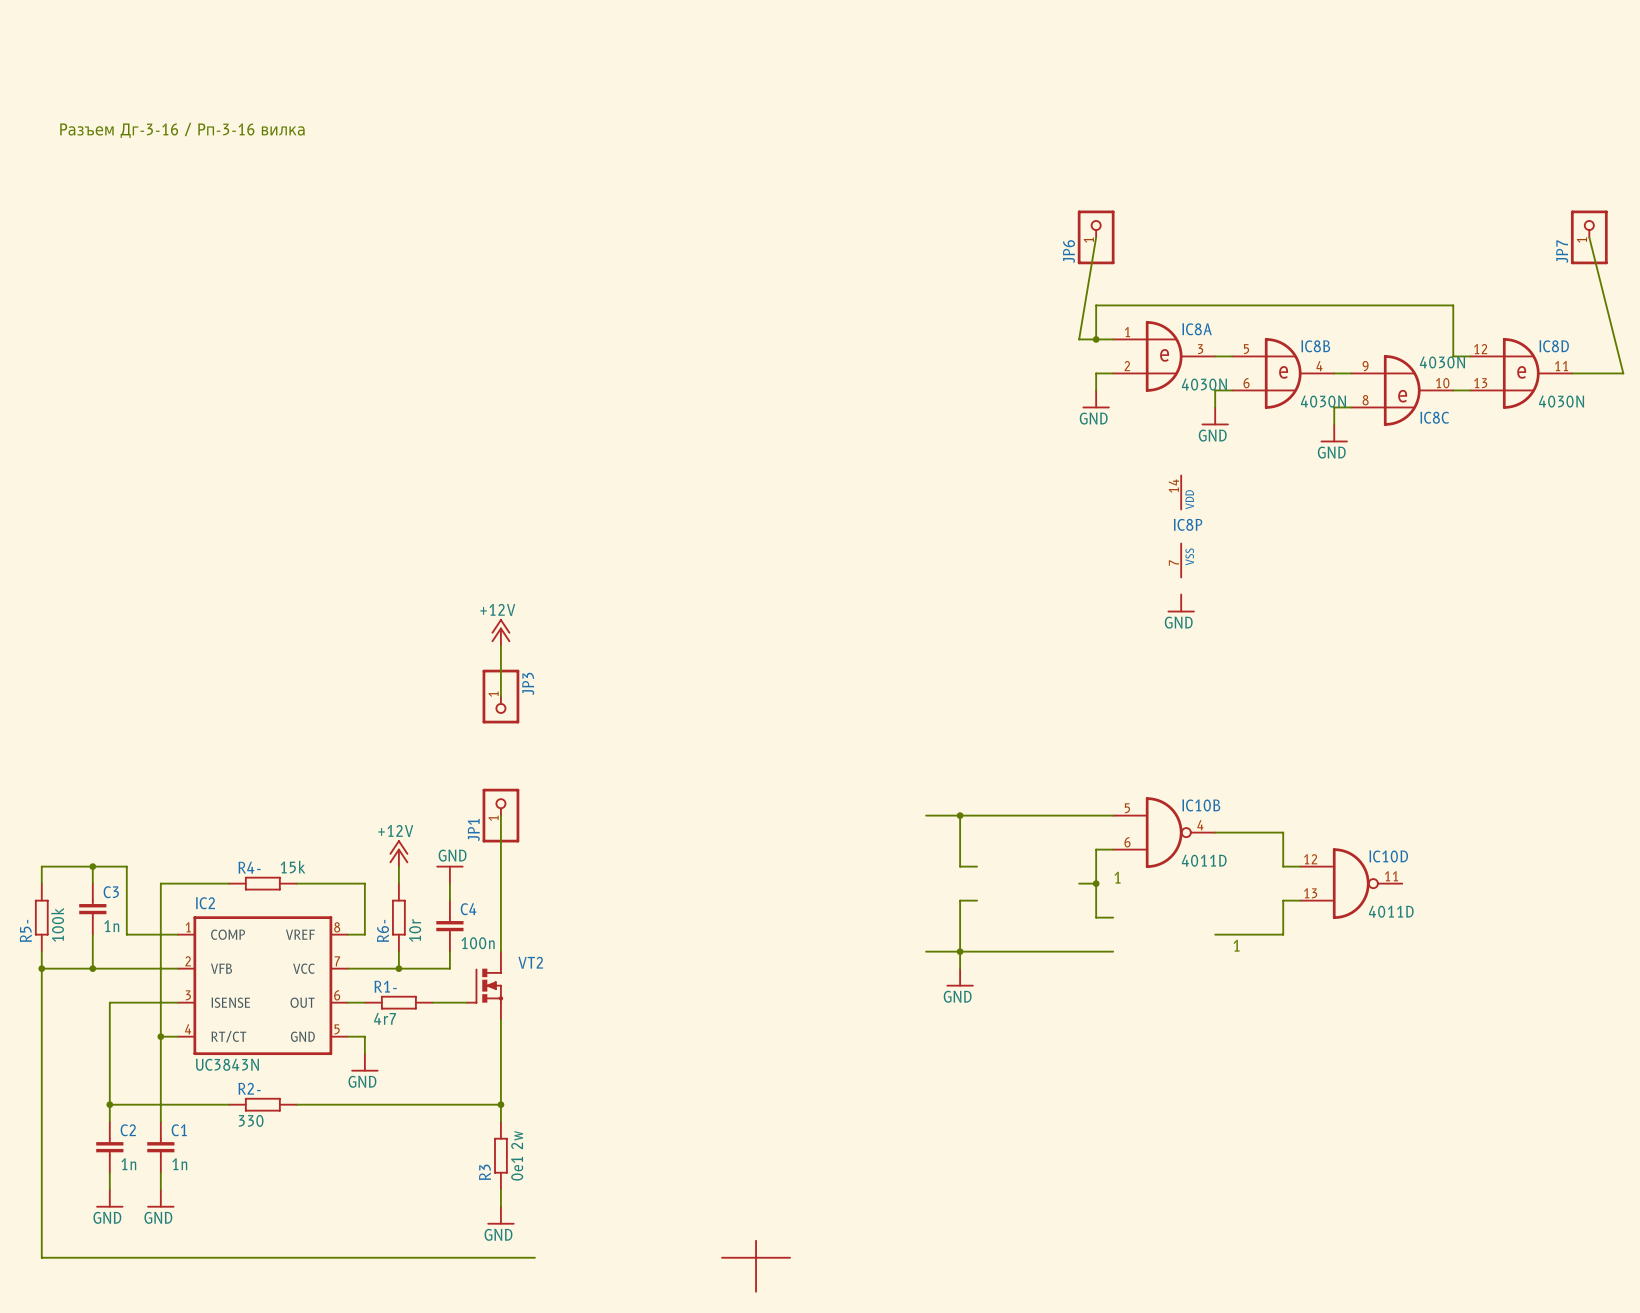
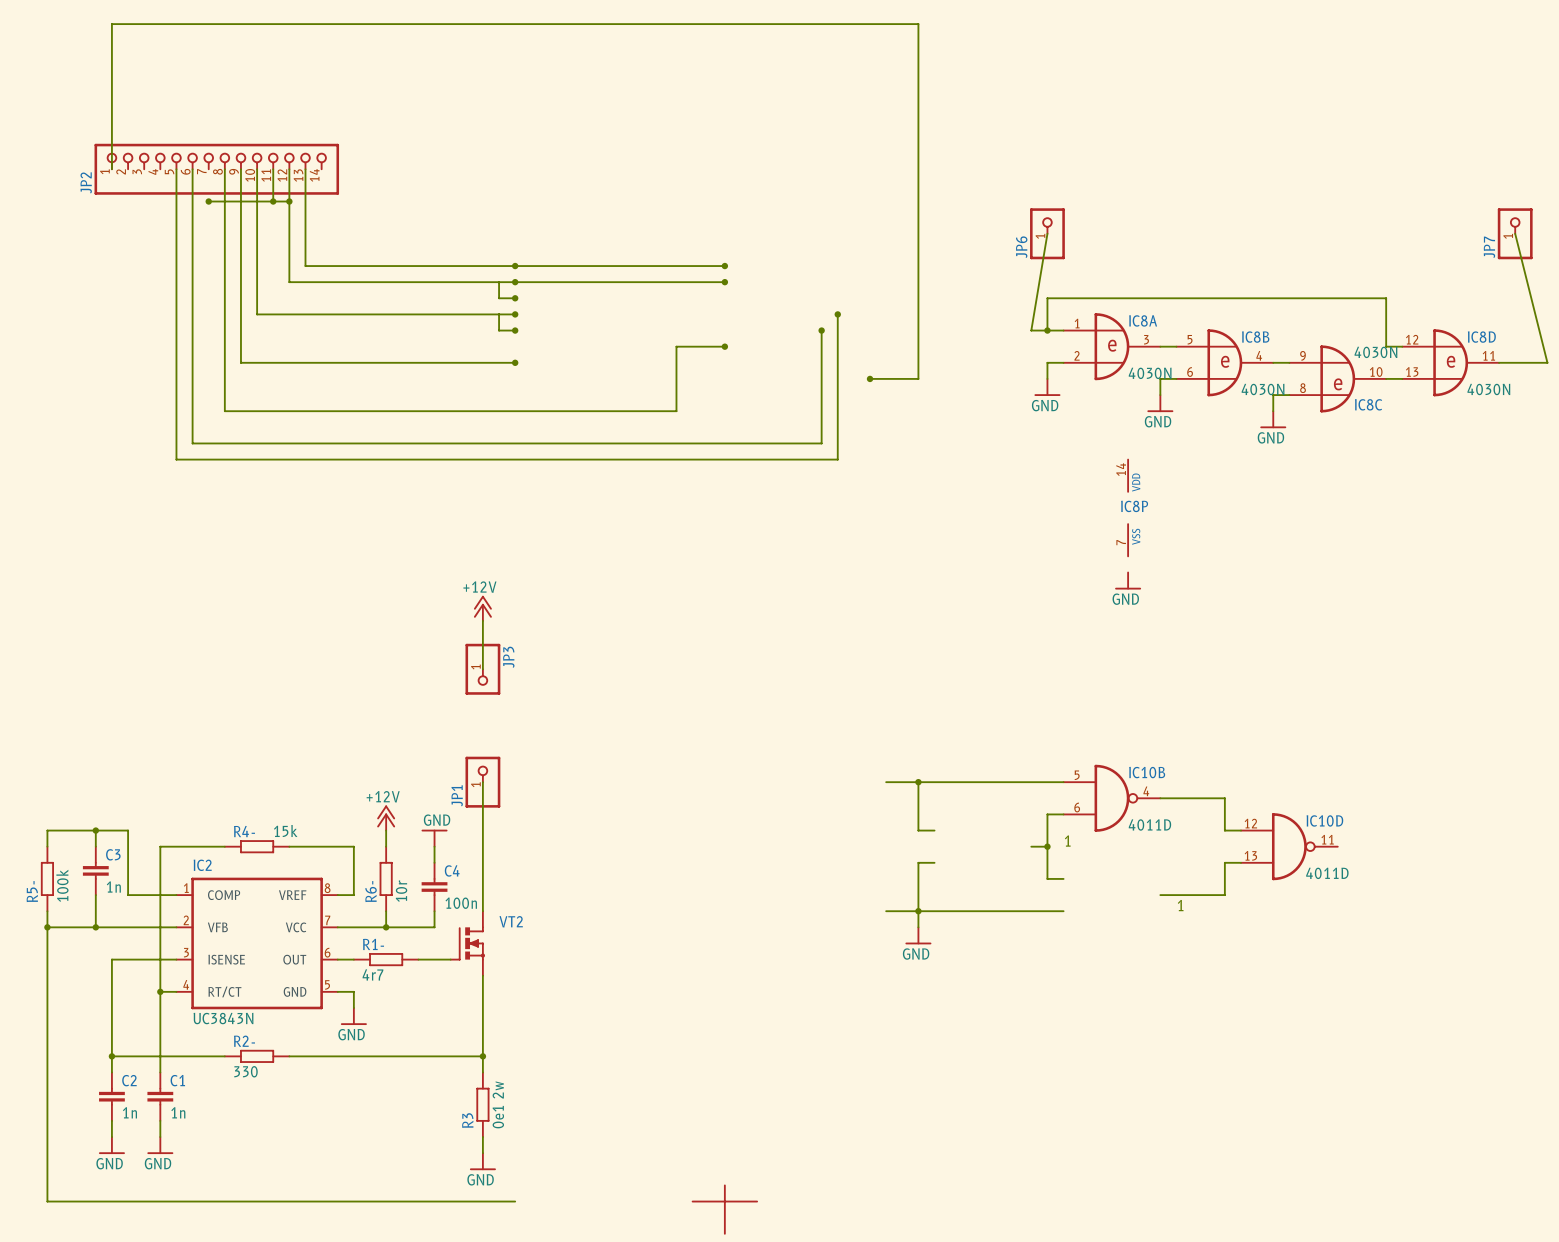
text: Разъем Дг-3-16 / Рп-3-16 вилка (182, 130) -> none
wire: none -> (111, 169) (111, 24) (918, 24) (918, 378) (870, 378)
wire: none -> (176, 169) (176, 459) (837, 459) (837, 314)
wire: none -> (192, 169) (192, 443) (821, 443) (821, 330)
JP2: none -> (216, 169)
wire: none -> (224, 169) (224, 411) (676, 411) (676, 346) (724, 346)
wire: none -> (240, 169) (240, 362) (515, 362)
wire: none -> (257, 169) (257, 314) (515, 314)
wire: none -> (273, 169) (273, 201)
wire: none -> (289, 169) (289, 282) (724, 282)
wire: none -> (305, 169) (305, 266) (724, 266)
wire: none -> (208, 201) (289, 201)
junction: none -> (208, 201)
junction: none -> (273, 201)
junction: none -> (289, 201)
junction: none -> (515, 266)
junction: none -> (724, 266)
wire: none -> (499, 282) (499, 298) (515, 298)
junction: none -> (515, 282)
junction: none -> (724, 282)
junction: none -> (515, 298)
wire: none -> (499, 314) (499, 330) (515, 330)
junction: none -> (515, 314)
junction: none -> (837, 314)
junction: none -> (515, 330)
junction: none -> (821, 330)
junction: none -> (724, 346)
junction: none -> (515, 362)
junction: none -> (870, 378)

